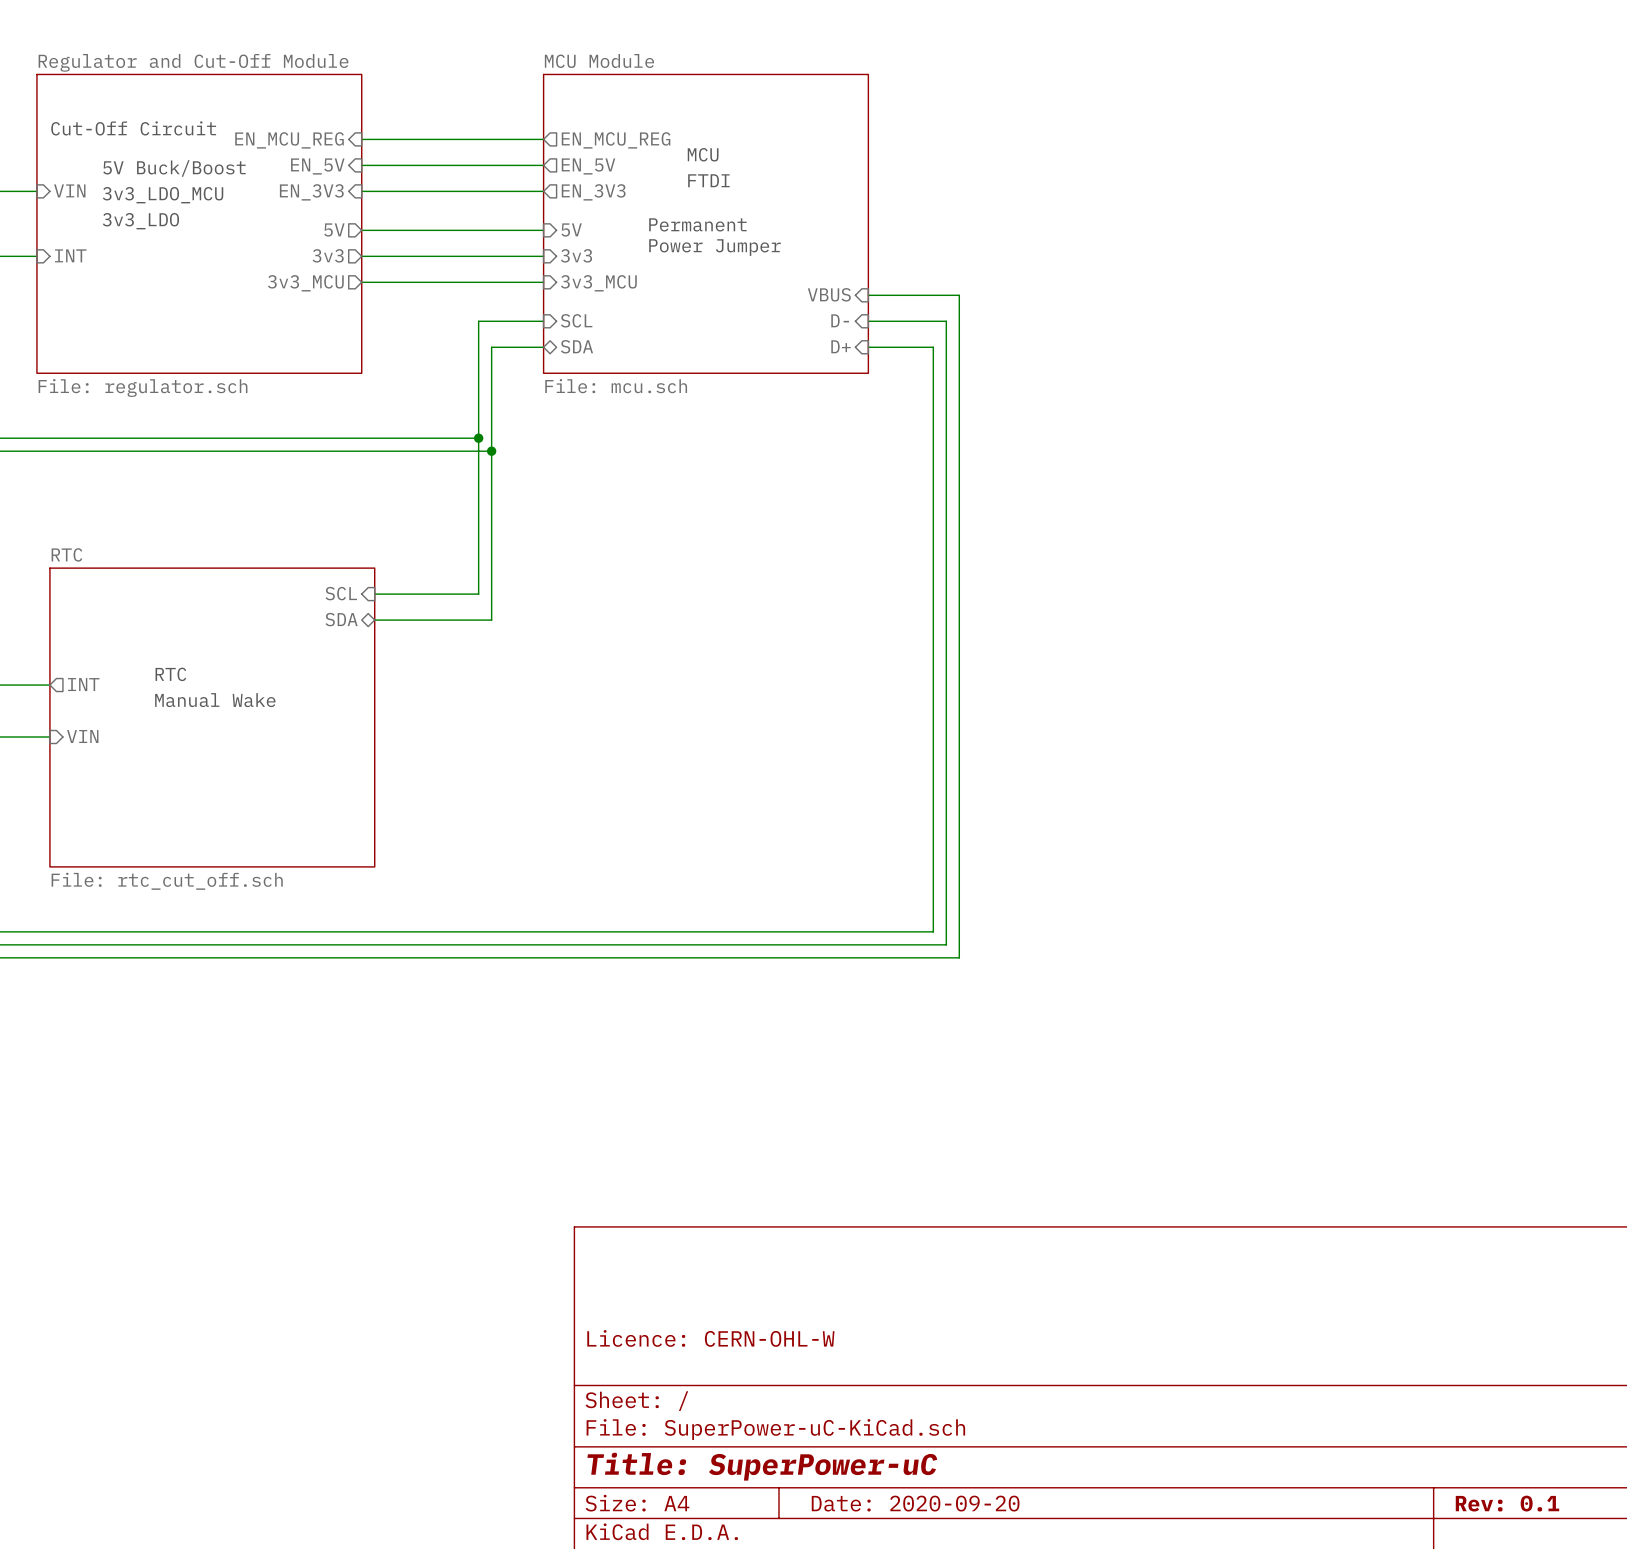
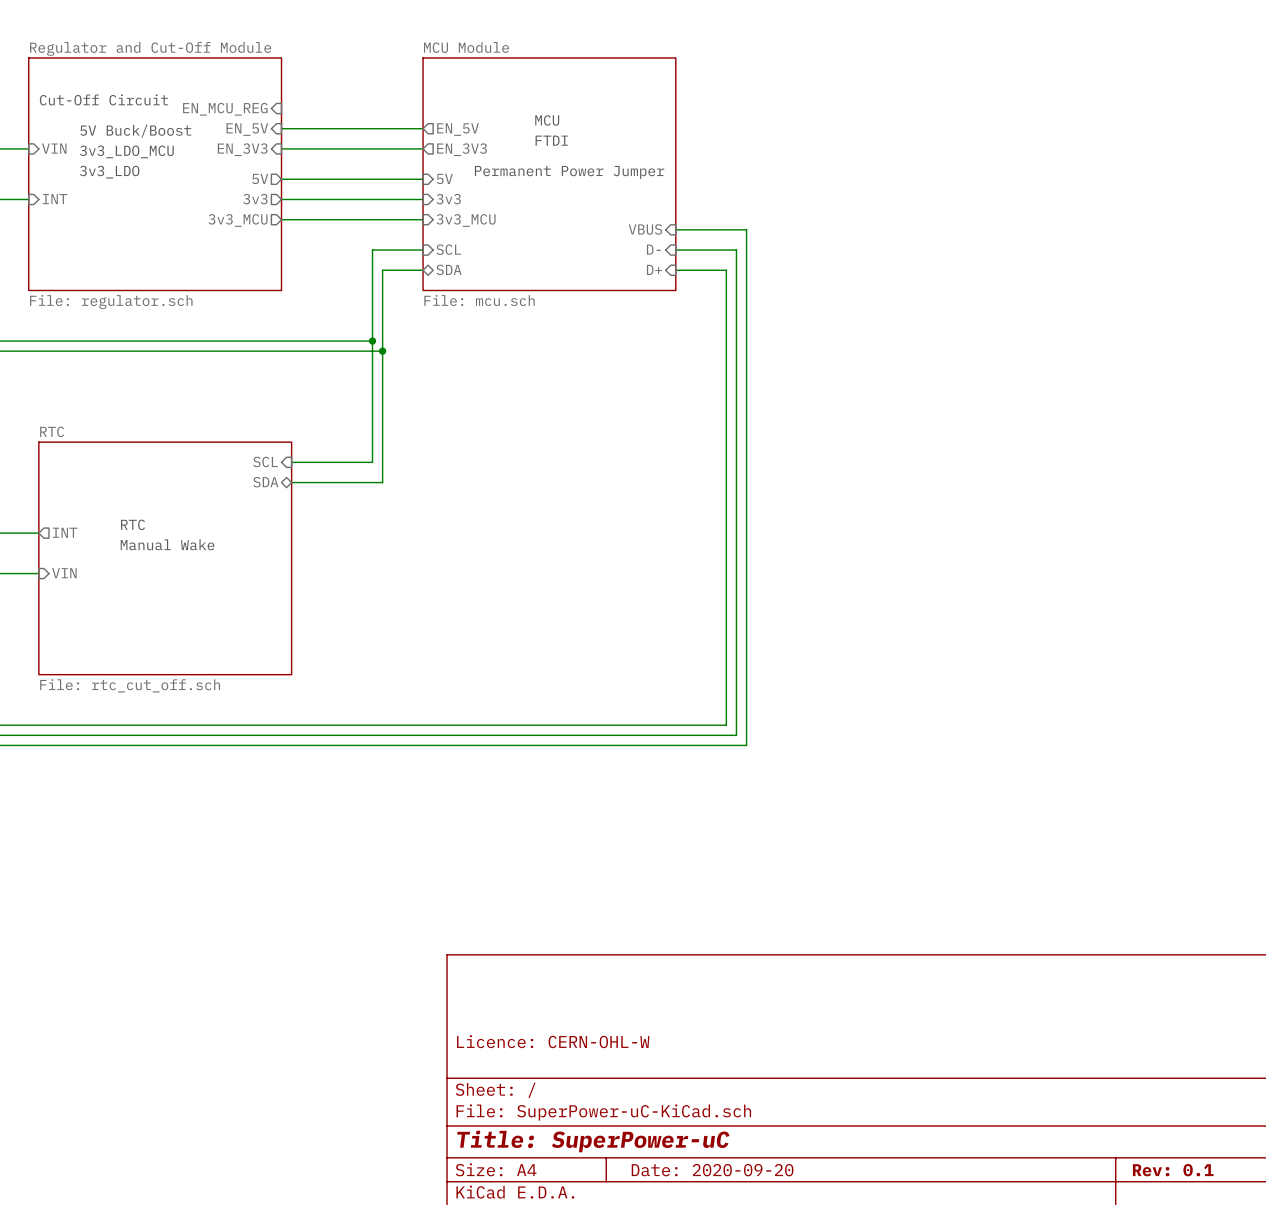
wire: (361, 139) (543, 139) -> none
sheet pin: EN_MCU_REG (616, 140) -> none
text: Permanent (697, 224) -> none
text: Power Jumper (714, 247) -> Permanent Power Jumper (569, 172)

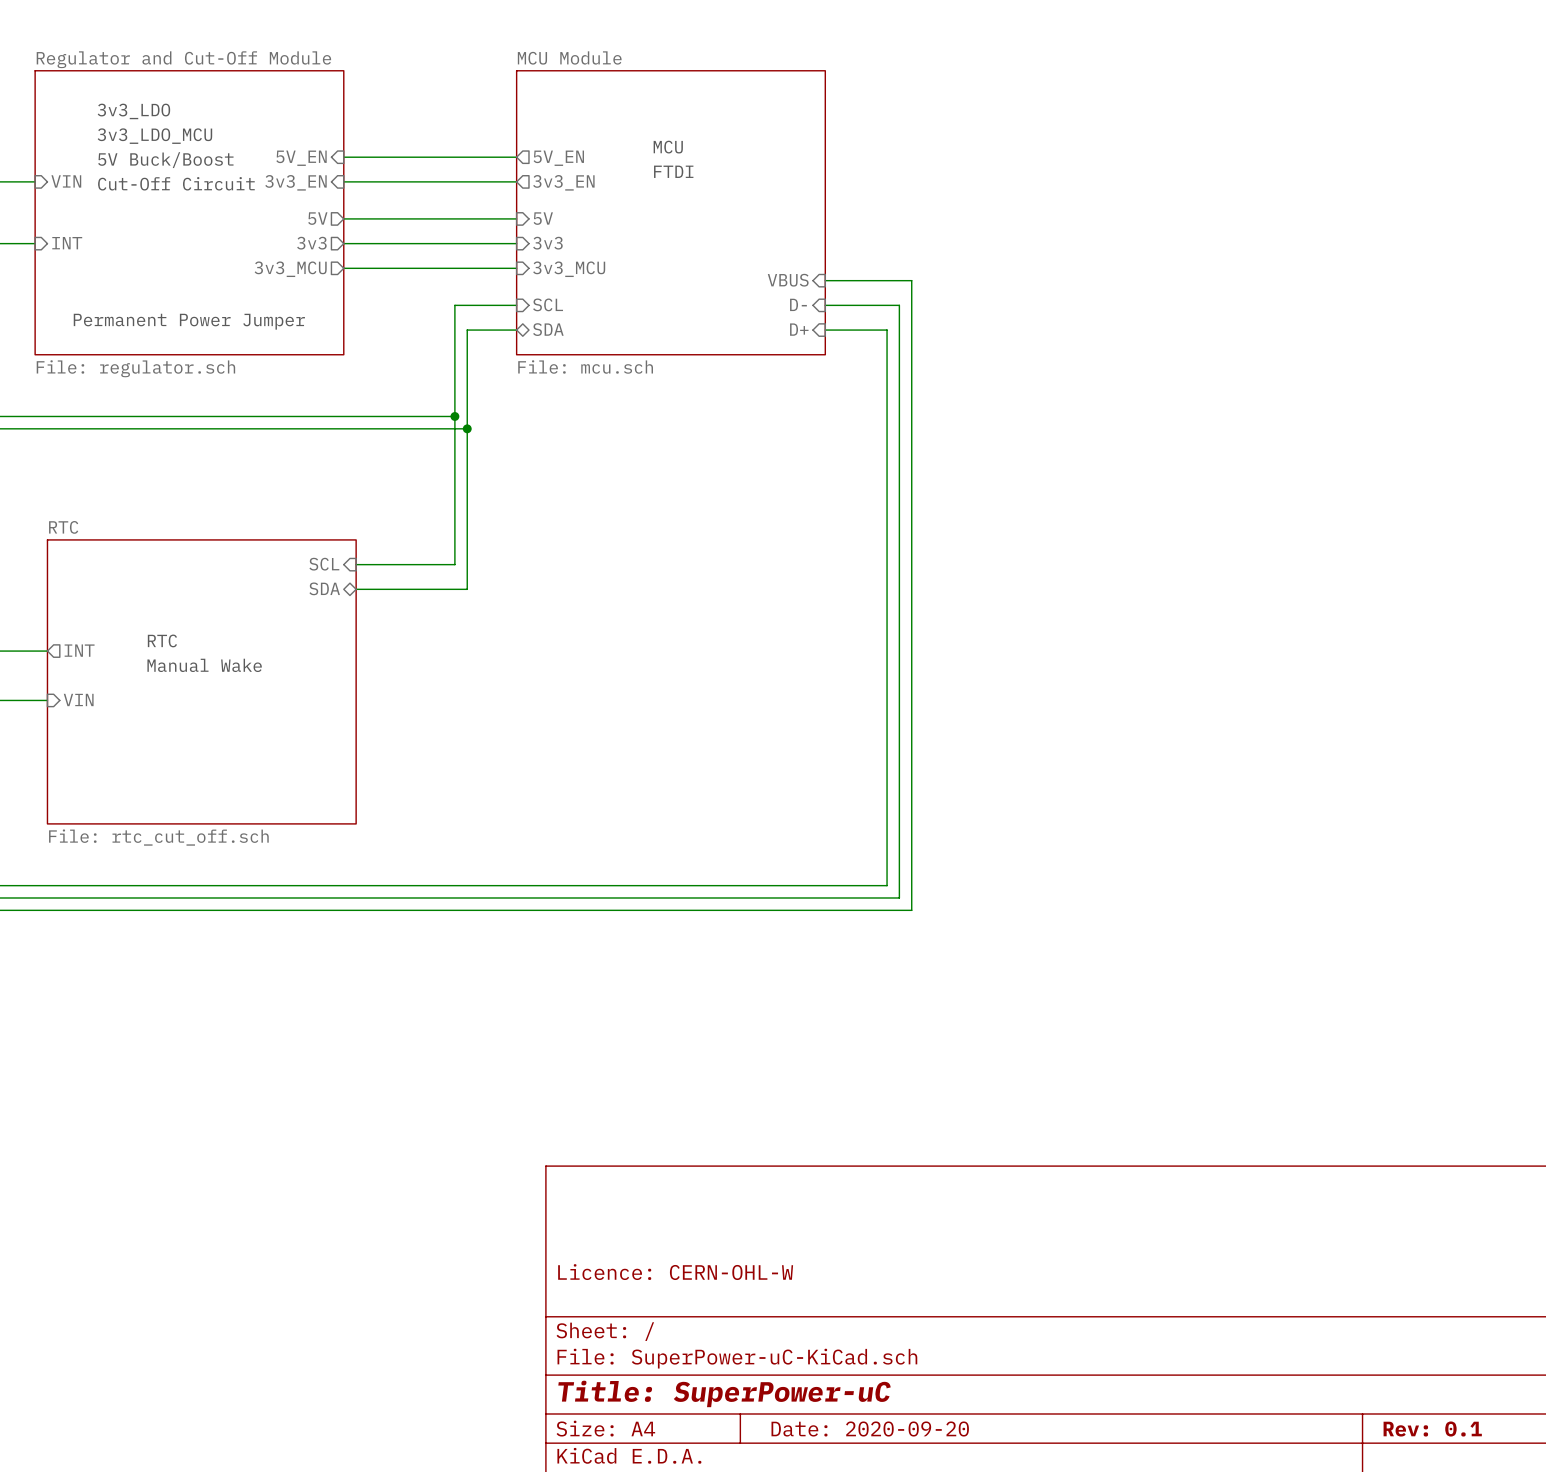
text: Cut-Off Circuit (104, 99) -> none
sheet pin: EN_MCU_REG (225, 109) -> none
text: none -> 3v3_LDO_MCU (154, 136)
sheet pin: EN_5V (247, 129) -> 5V_EN (301, 158)
sheet pin: EN_5V (458, 129) -> 5V_EN (558, 158)
sheet pin: EN_3V3 (242, 149) -> 3v3_EN (295, 182)
sheet pin: EN_3V3 (462, 149) -> 3v3_EN (563, 182)
text: 3v3_LDO_MCU (126, 151) -> Cut-Off Circuit (176, 183)
text position: 3v3_LDO (109, 172) -> 3v3_LDO (133, 111)
text: Permanent Power Jumper (569, 172) -> none
text: none -> Permanent Power Jumper (189, 321)

